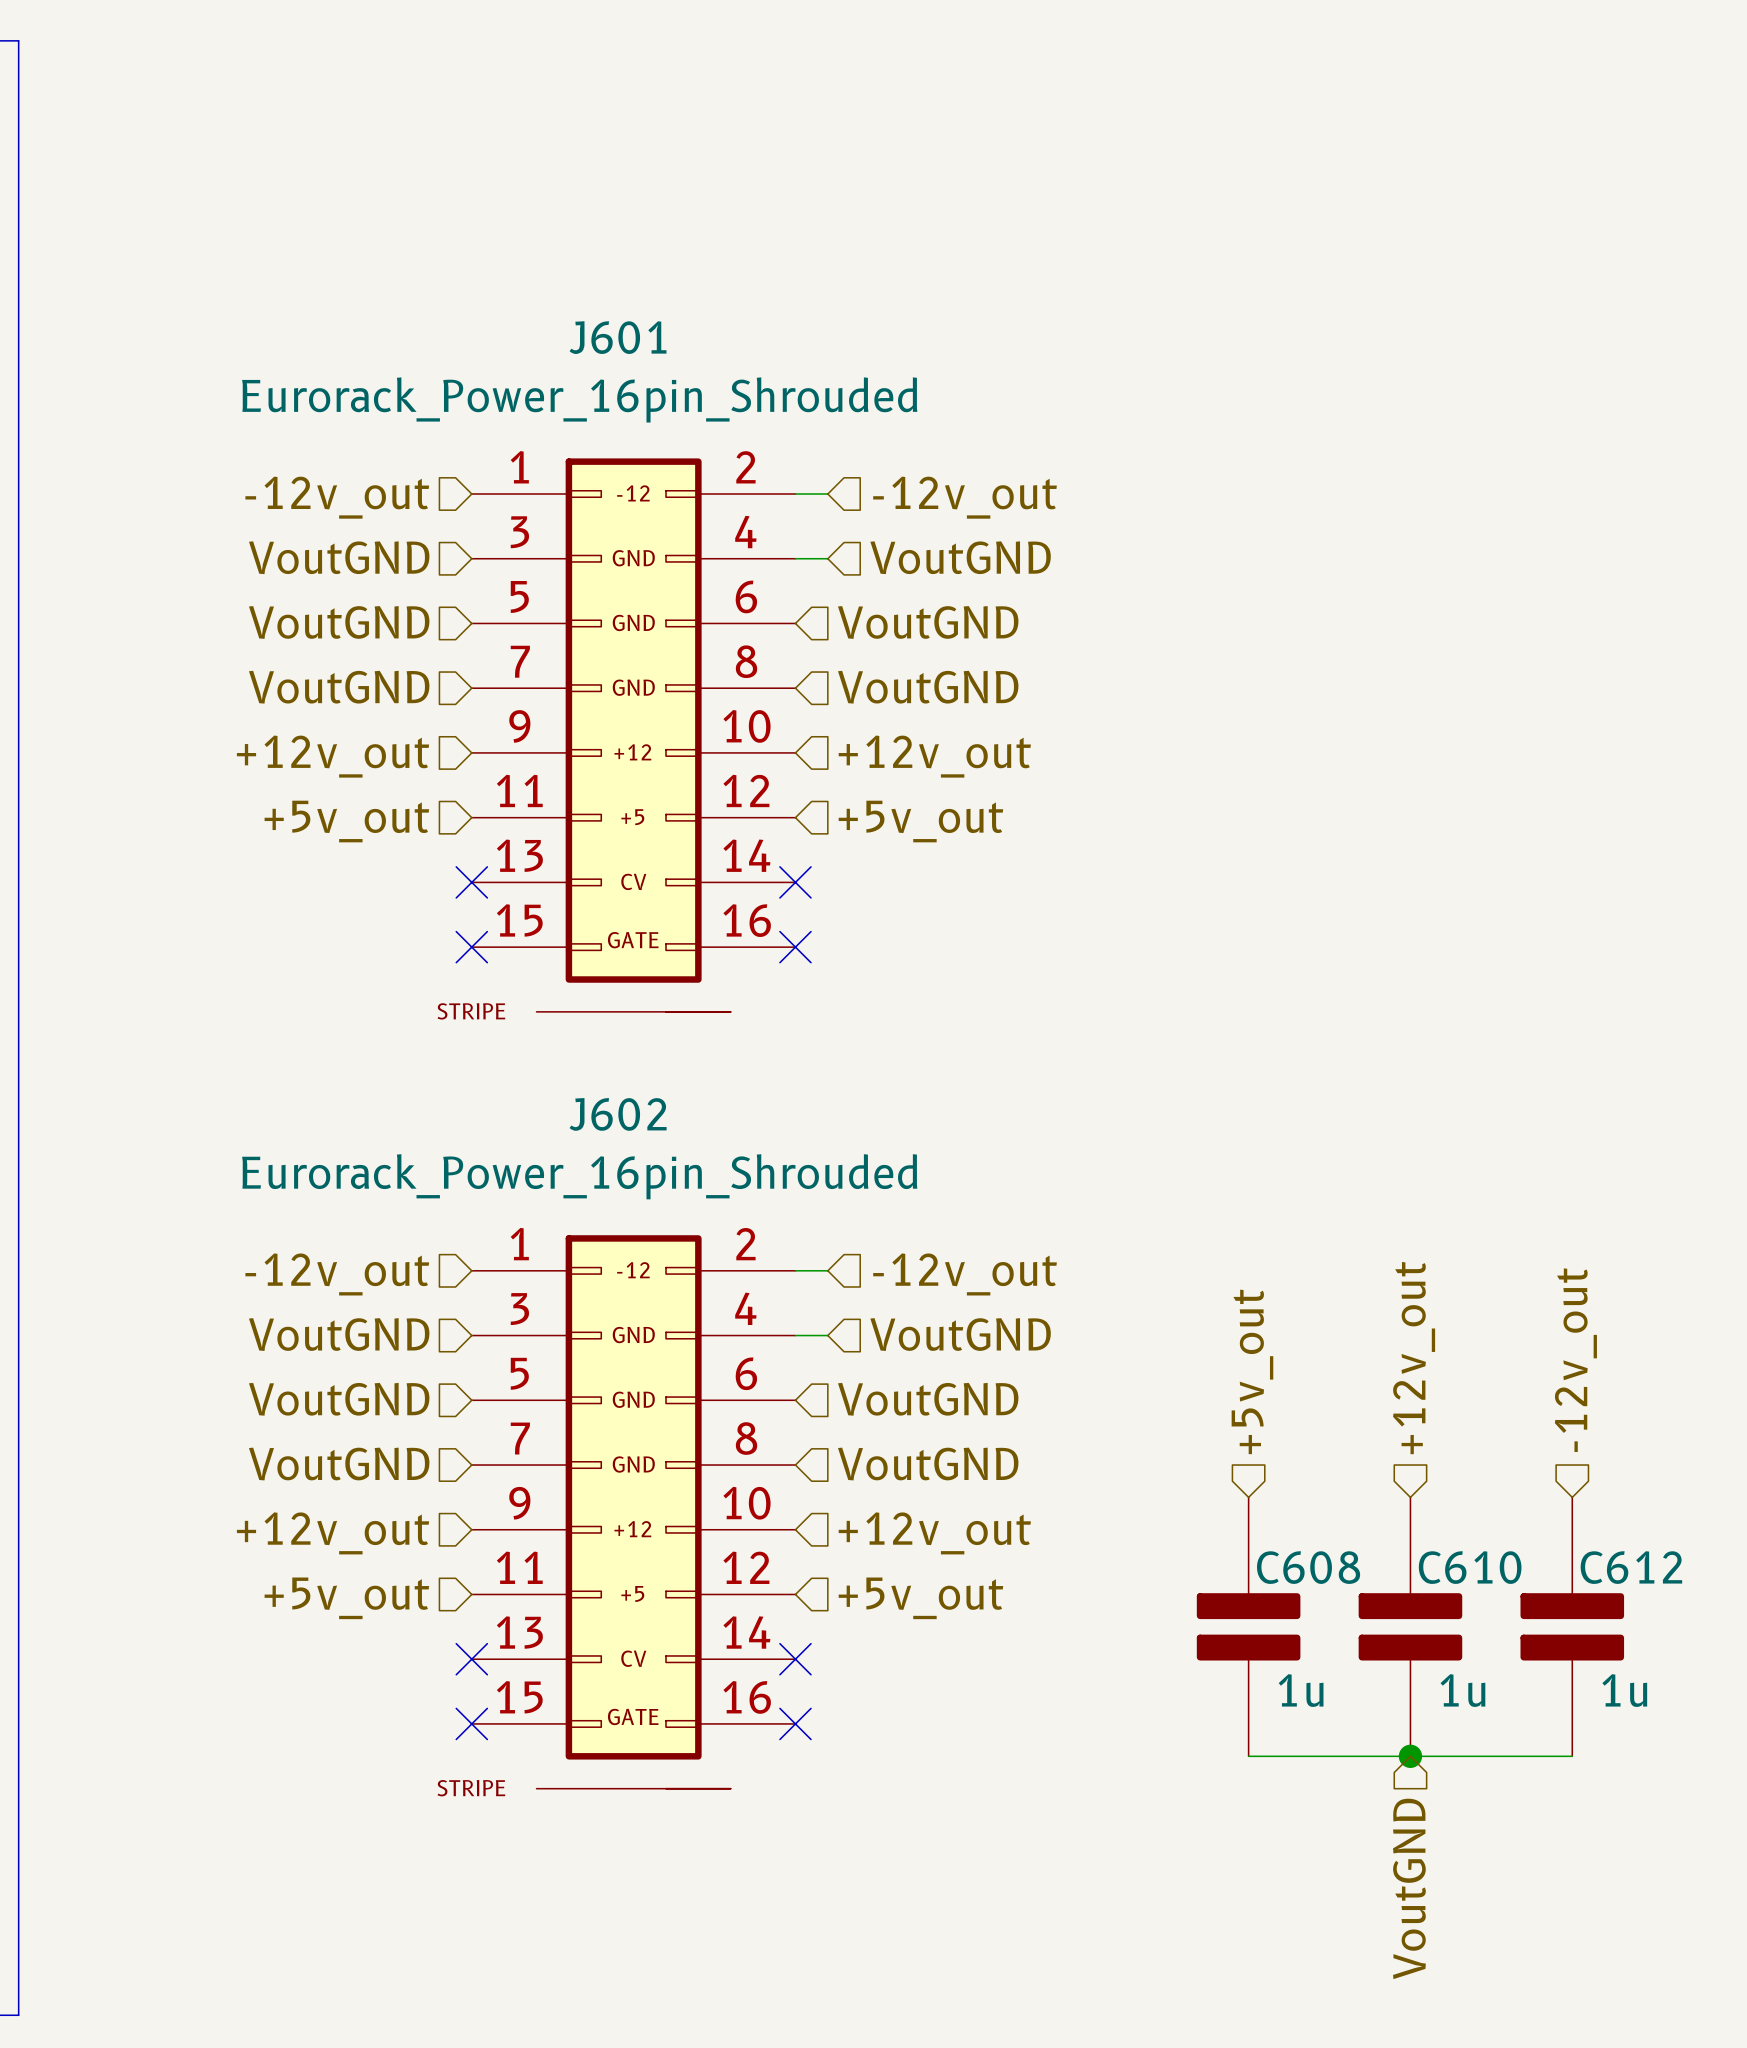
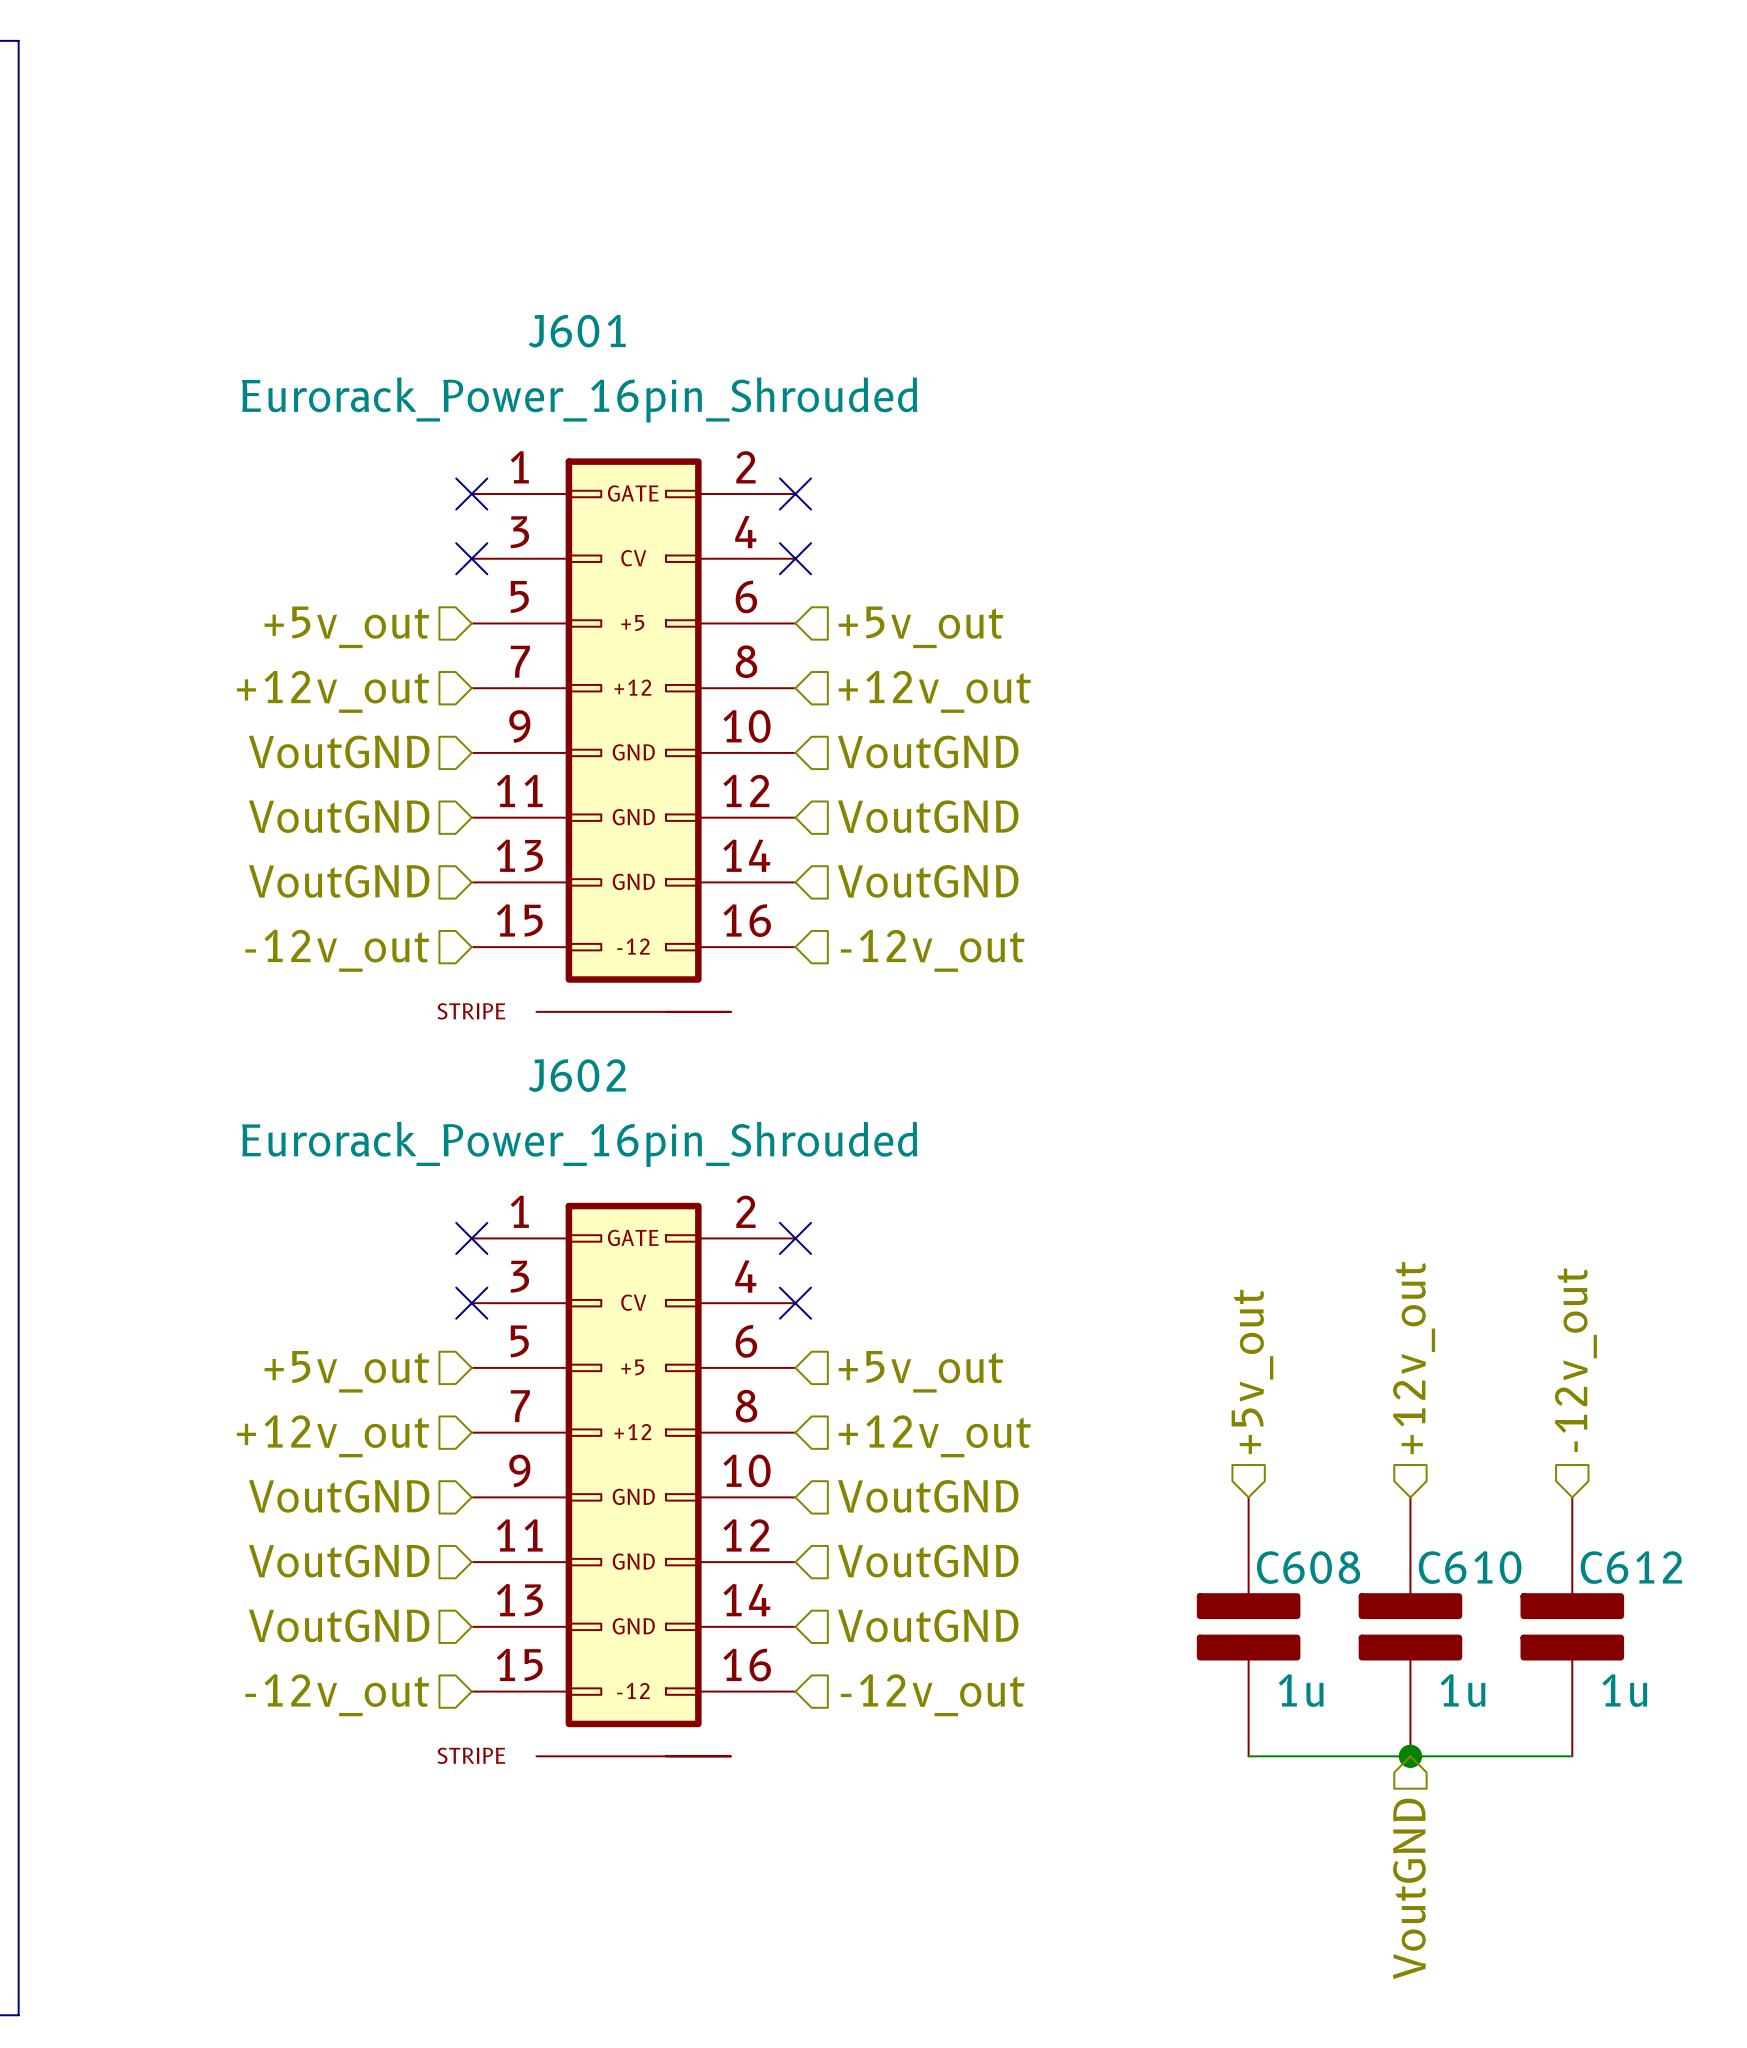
J601 symbol: [471, 458, 796, 1012] -> [471, 458, 796, 1012]
no-connect mark: none -> (471, 494)
wire: (795, 494) (827, 494) -> none
no-connect mark: none -> (795, 494)
hierarchical label: -12v_out (337, 497) -> none
hierarchical label: -12v_out (965, 497) -> none
hierarchical label: VoutGND (339, 557) -> none
hierarchical label: VoutGND (960, 557) -> none
no-connect mark: none -> (471, 558)
wire: (795, 558) (827, 558) -> none
no-connect mark: none -> (795, 558)
hierarchical label: VoutGND (339, 622) -> +5v_out (346, 627)
hierarchical label: VoutGND (928, 622) -> +5v_out (920, 627)
hierarchical label: VoutGND (339, 687) -> +12v_out (333, 691)
hierarchical label: VoutGND (928, 687) -> +12v_out (934, 691)
hierarchical label: +12v_out (333, 756) -> VoutGND (339, 751)
hierarchical label: +12v_out (934, 756) -> VoutGND (928, 751)
hierarchical label: +5v_out (346, 821) -> VoutGND (339, 816)
hierarchical label: +5v_out (920, 821) -> VoutGND (928, 816)
hierarchical label: none -> VoutGND (339, 881)
hierarchical label: none -> VoutGND (928, 881)
no-connect mark: (471, 882) -> none
no-connect mark: (795, 882) -> none
no-connect mark: (471, 947) -> none
no-connect mark: (795, 947) -> none
hierarchical label: none -> -12v_out (337, 950)
hierarchical label: none -> -12v_out (932, 950)
J602 symbol: [471, 1235, 796, 1789] -> [471, 1202, 796, 1757]
no-connect mark: none -> (471, 1238)
no-connect mark: none -> (795, 1238)
wire: (795, 1270) (827, 1270) -> none
hierarchical label: -12v_out (337, 1274) -> none
hierarchical label: -12v_out (965, 1274) -> none
no-connect mark: none -> (471, 1303)
no-connect mark: none -> (795, 1303)
hierarchical label: VoutGND (339, 1334) -> none
hierarchical label: VoutGND (960, 1334) -> none
wire: (795, 1335) (827, 1335) -> none
hierarchical label: VoutGND (339, 1399) -> none
hierarchical label: VoutGND (928, 1399) -> none
hierarchical label position: VoutGND (339, 1464) -> VoutGND (339, 1496)
hierarchical label position: VoutGND (928, 1464) -> VoutGND (928, 1496)
hierarchical label position: +12v_out (333, 1533) -> +12v_out (333, 1436)
hierarchical label position: +12v_out (934, 1533) -> +12v_out (934, 1436)
hierarchical label: none -> VoutGND (339, 1561)
hierarchical label: none -> VoutGND (928, 1561)
hierarchical label position: +5v_out (346, 1598) -> +5v_out (346, 1371)
hierarchical label position: +5v_out (920, 1598) -> +5v_out (920, 1371)
hierarchical label: none -> VoutGND (339, 1625)
hierarchical label: none -> VoutGND (928, 1625)
no-connect mark: (471, 1659) -> none
no-connect mark: (795, 1659) -> none
hierarchical label: none -> -12v_out (337, 1695)
hierarchical label: none -> -12v_out (932, 1695)
no-connect mark: (471, 1723) -> none
no-connect mark: (795, 1723) -> none

